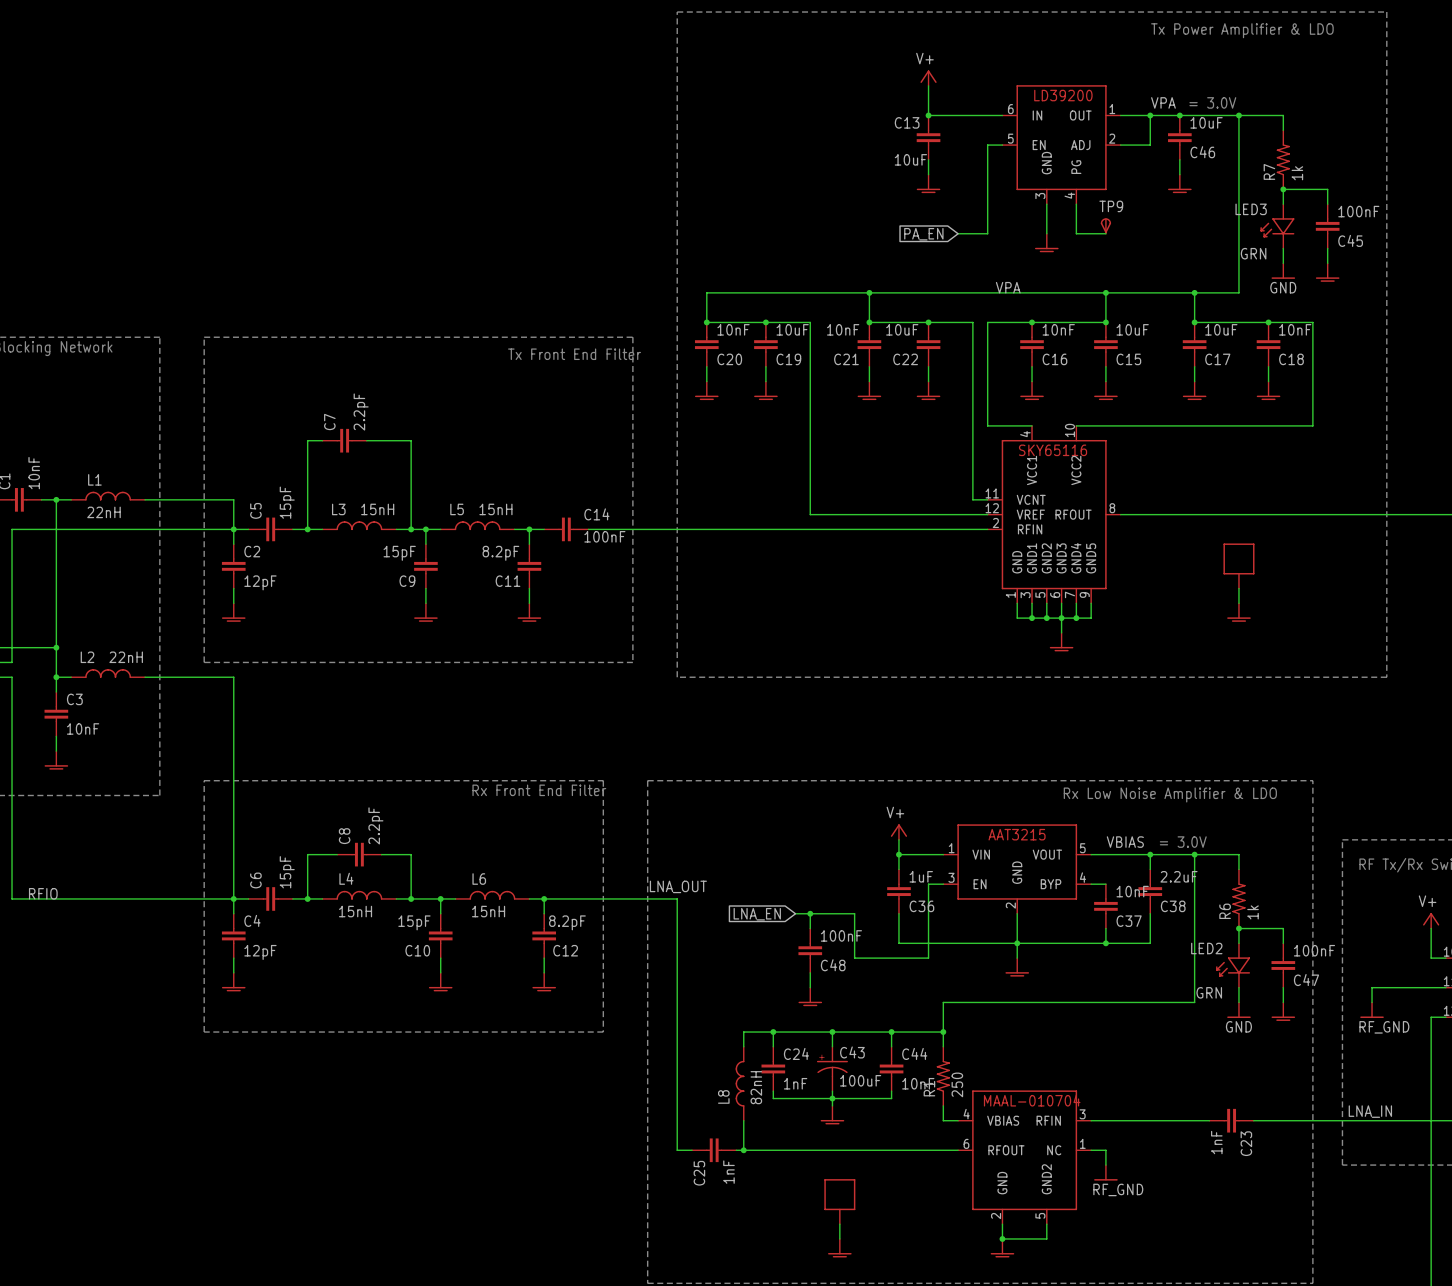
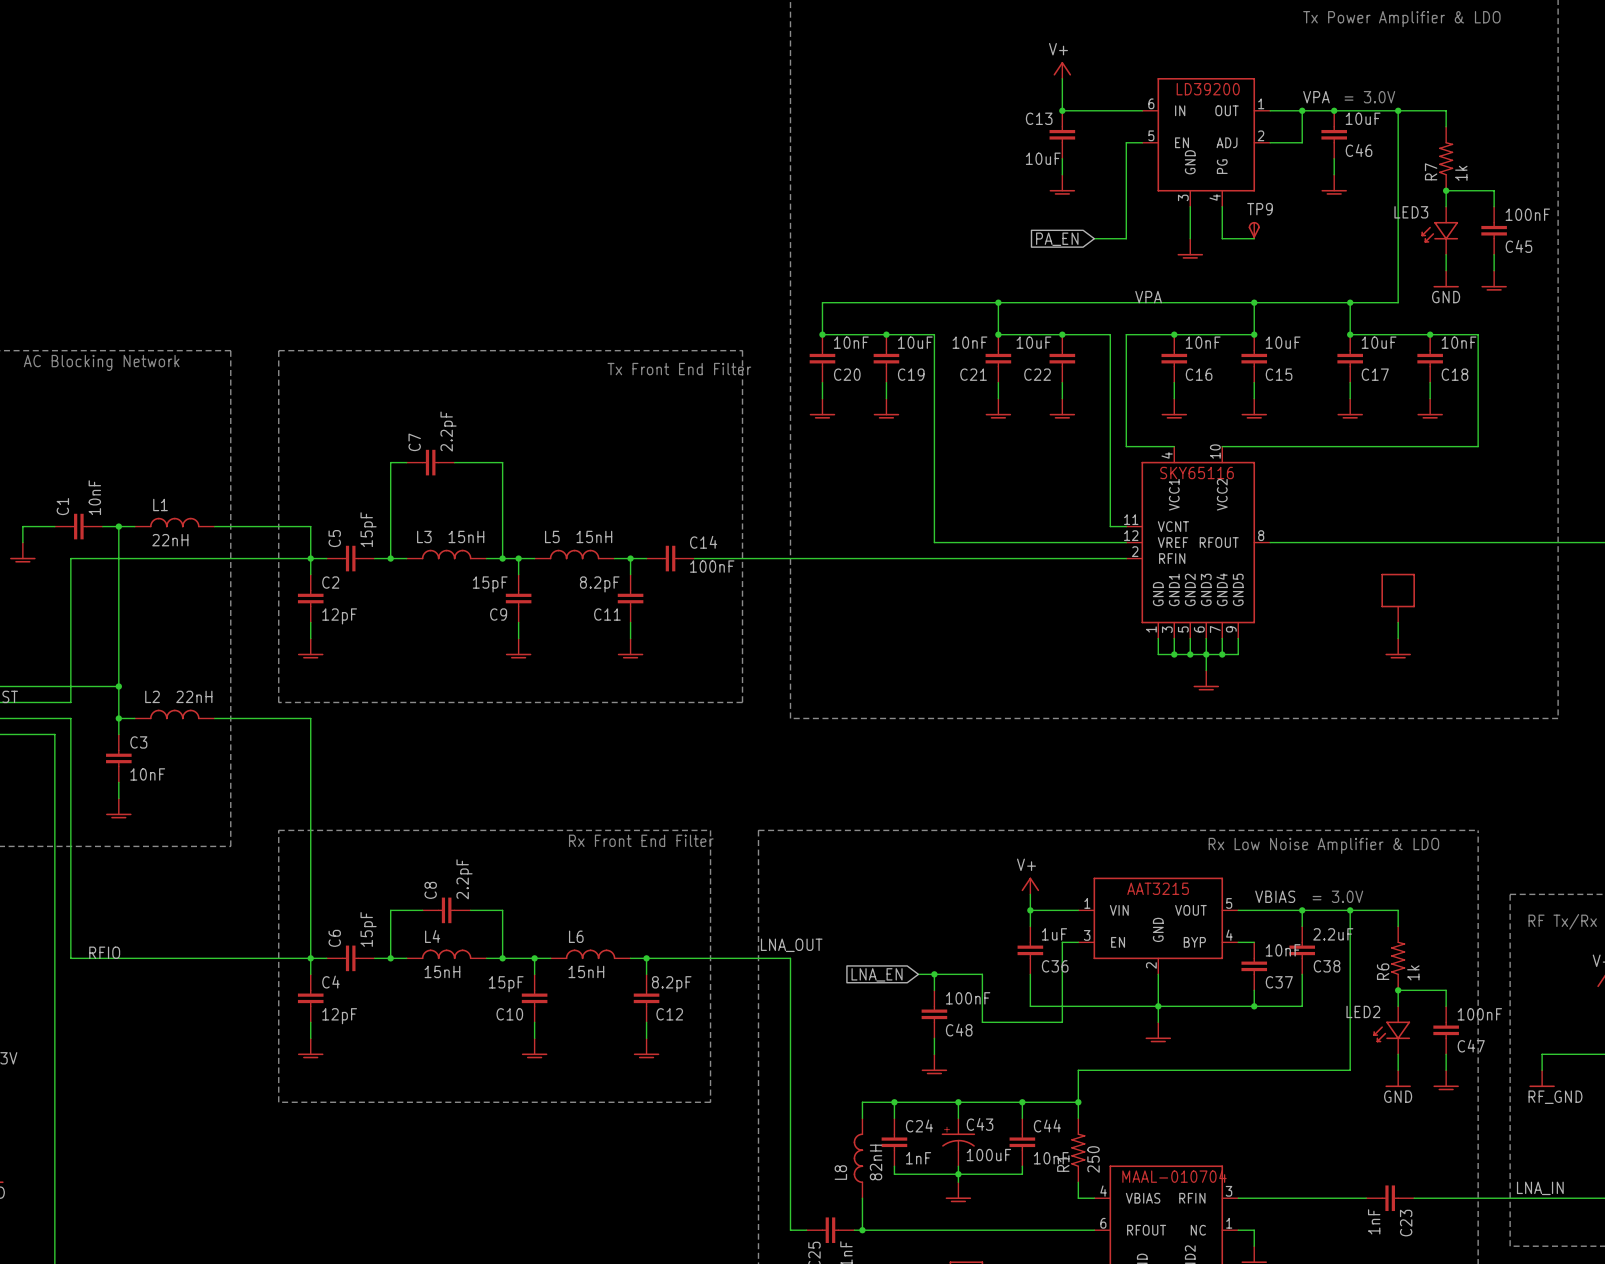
LED3 value: GRN (1253, 253) -> none
LED2 value: GRN (1209, 992) -> none

